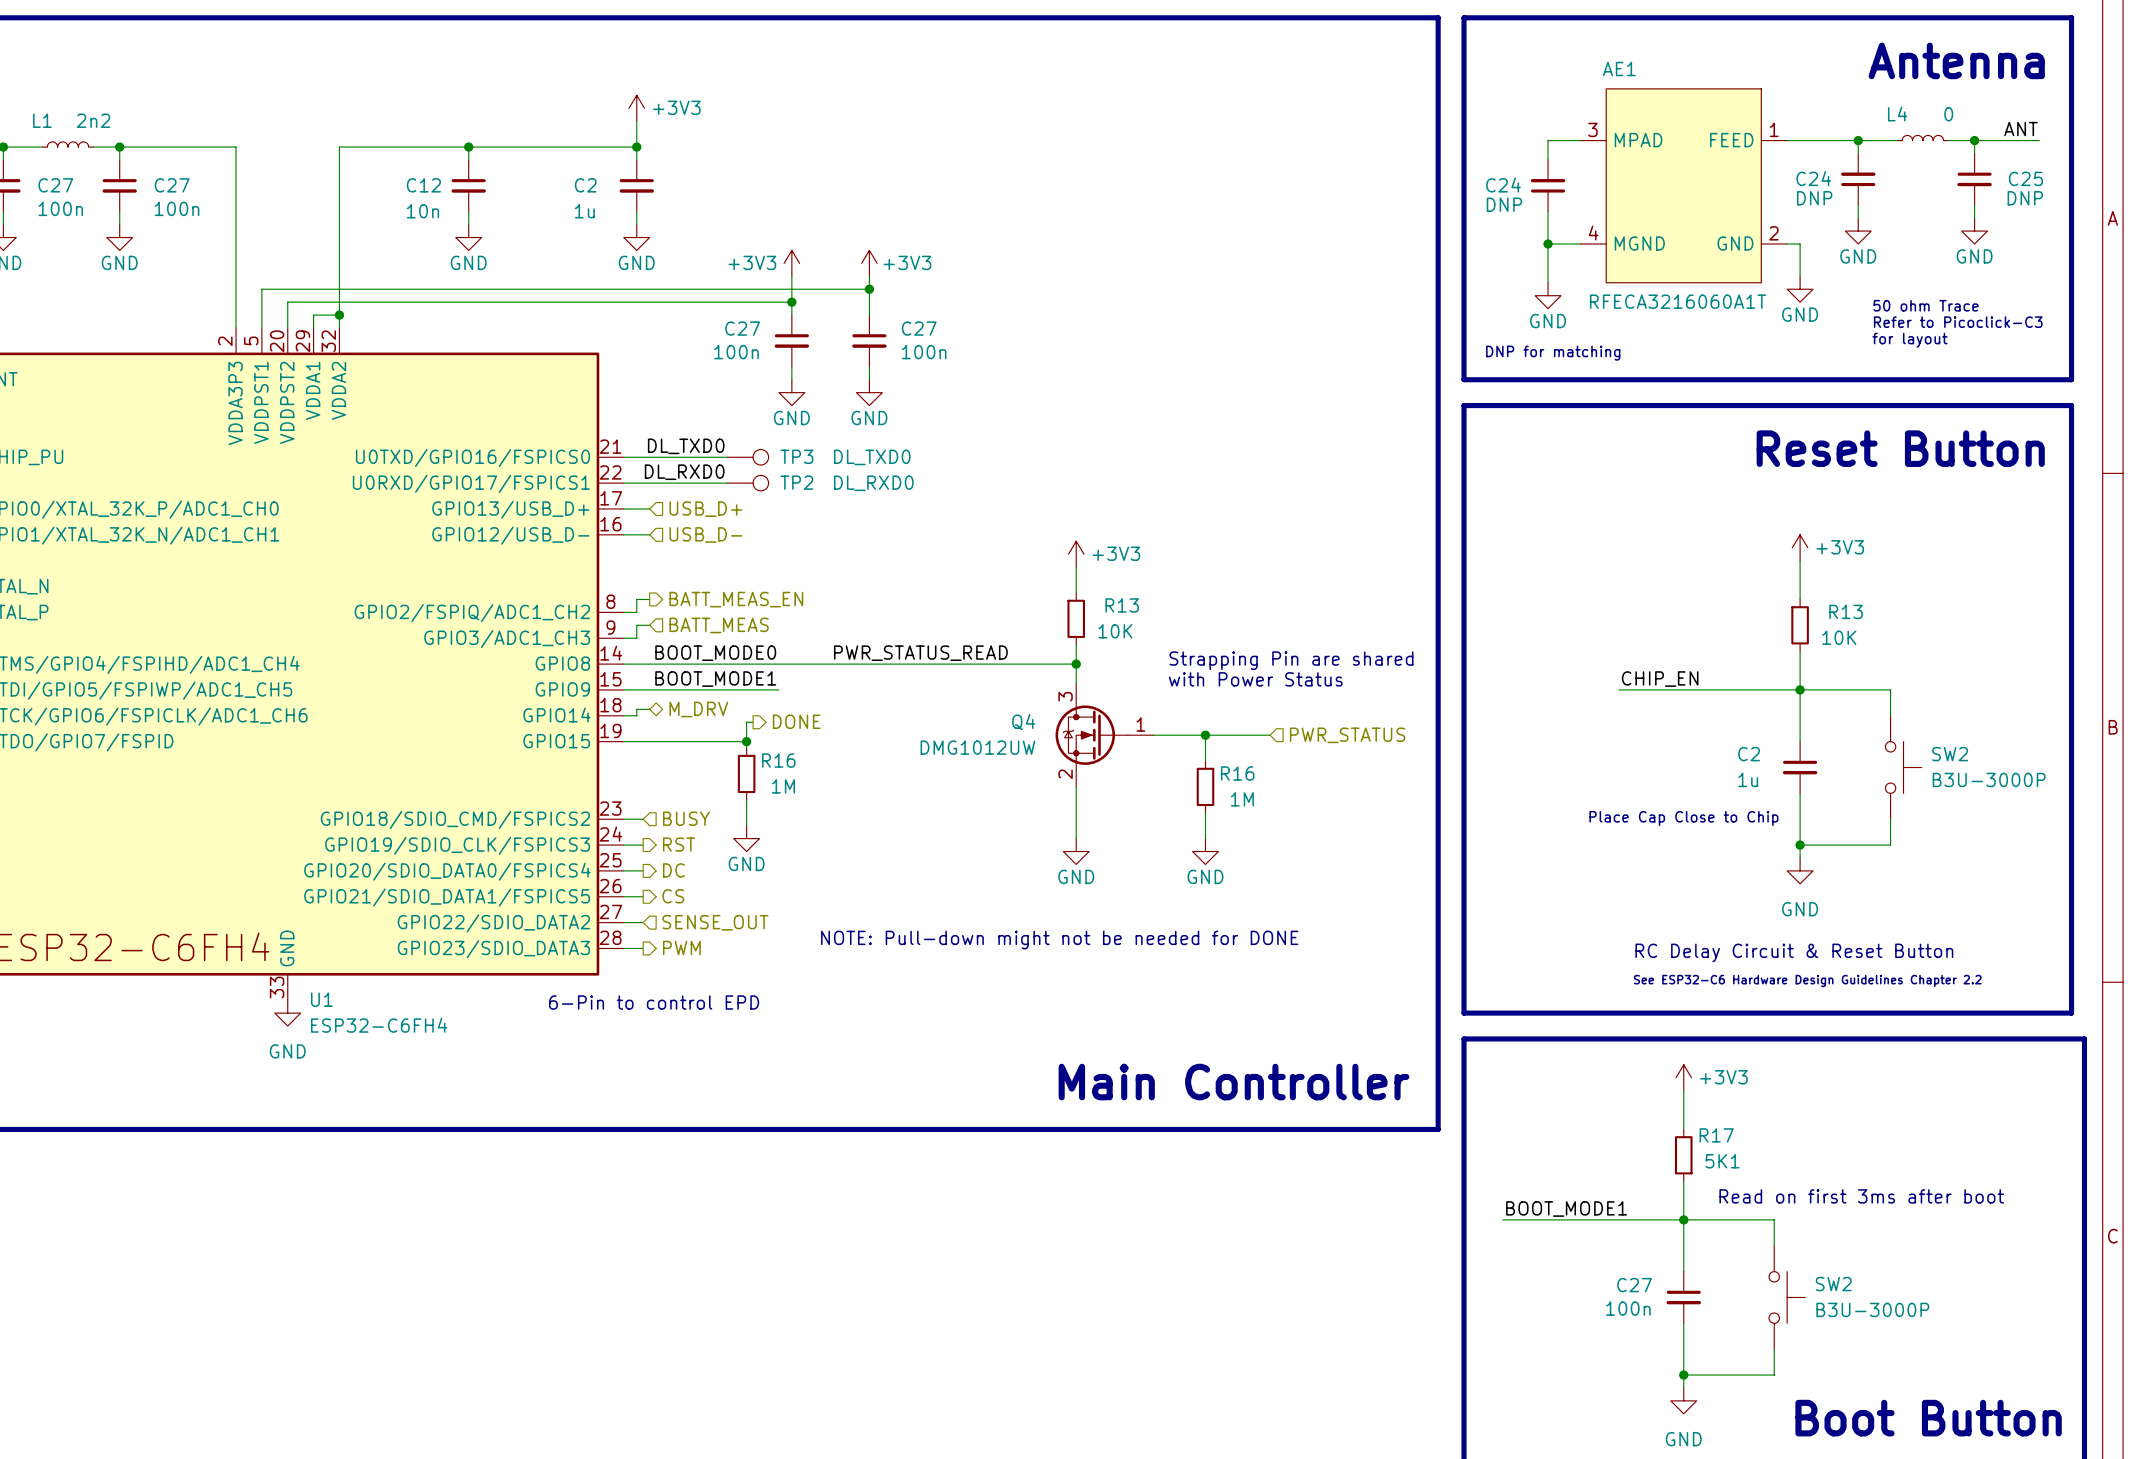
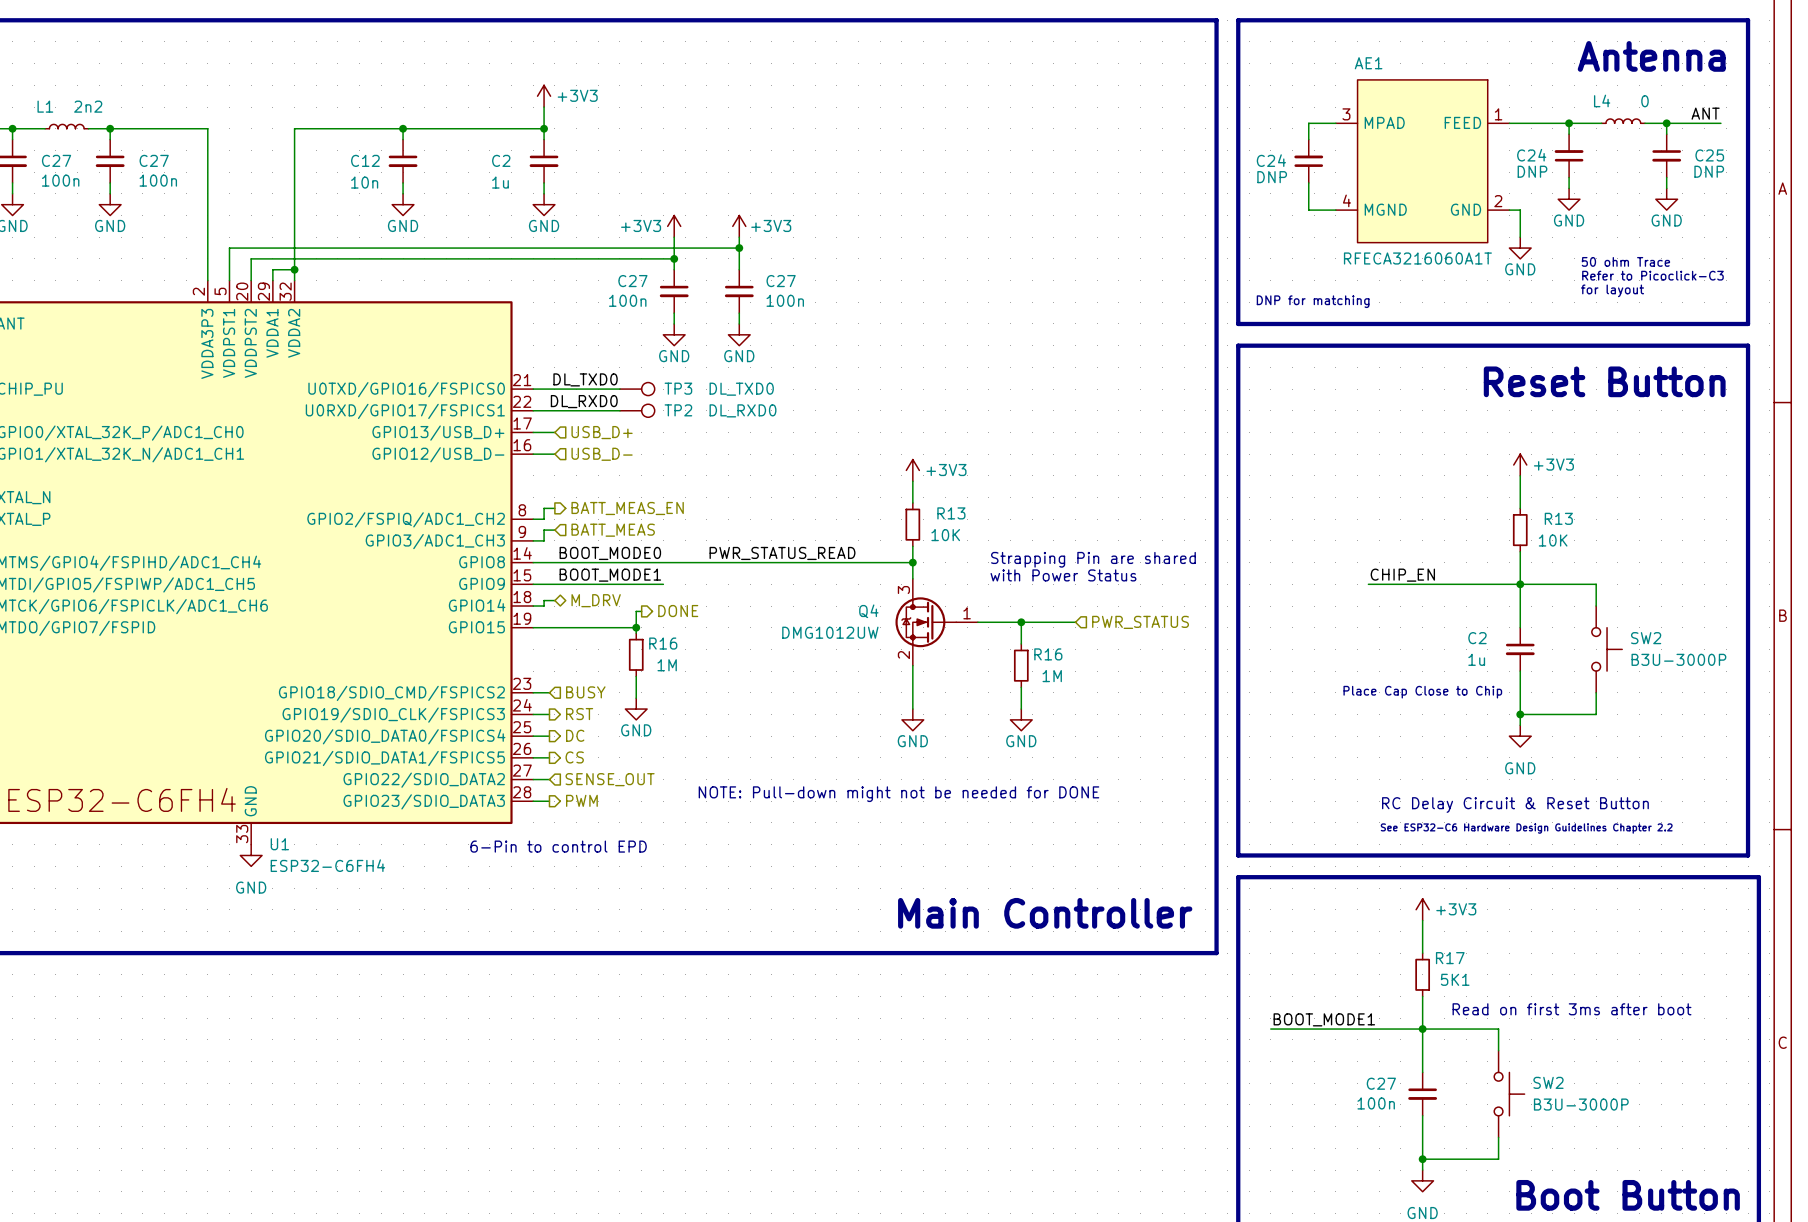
wire: (1548, 244) (1548, 282) -> none
junction: (1548, 244) -> none
power symbol: GND (1548, 295) -> none

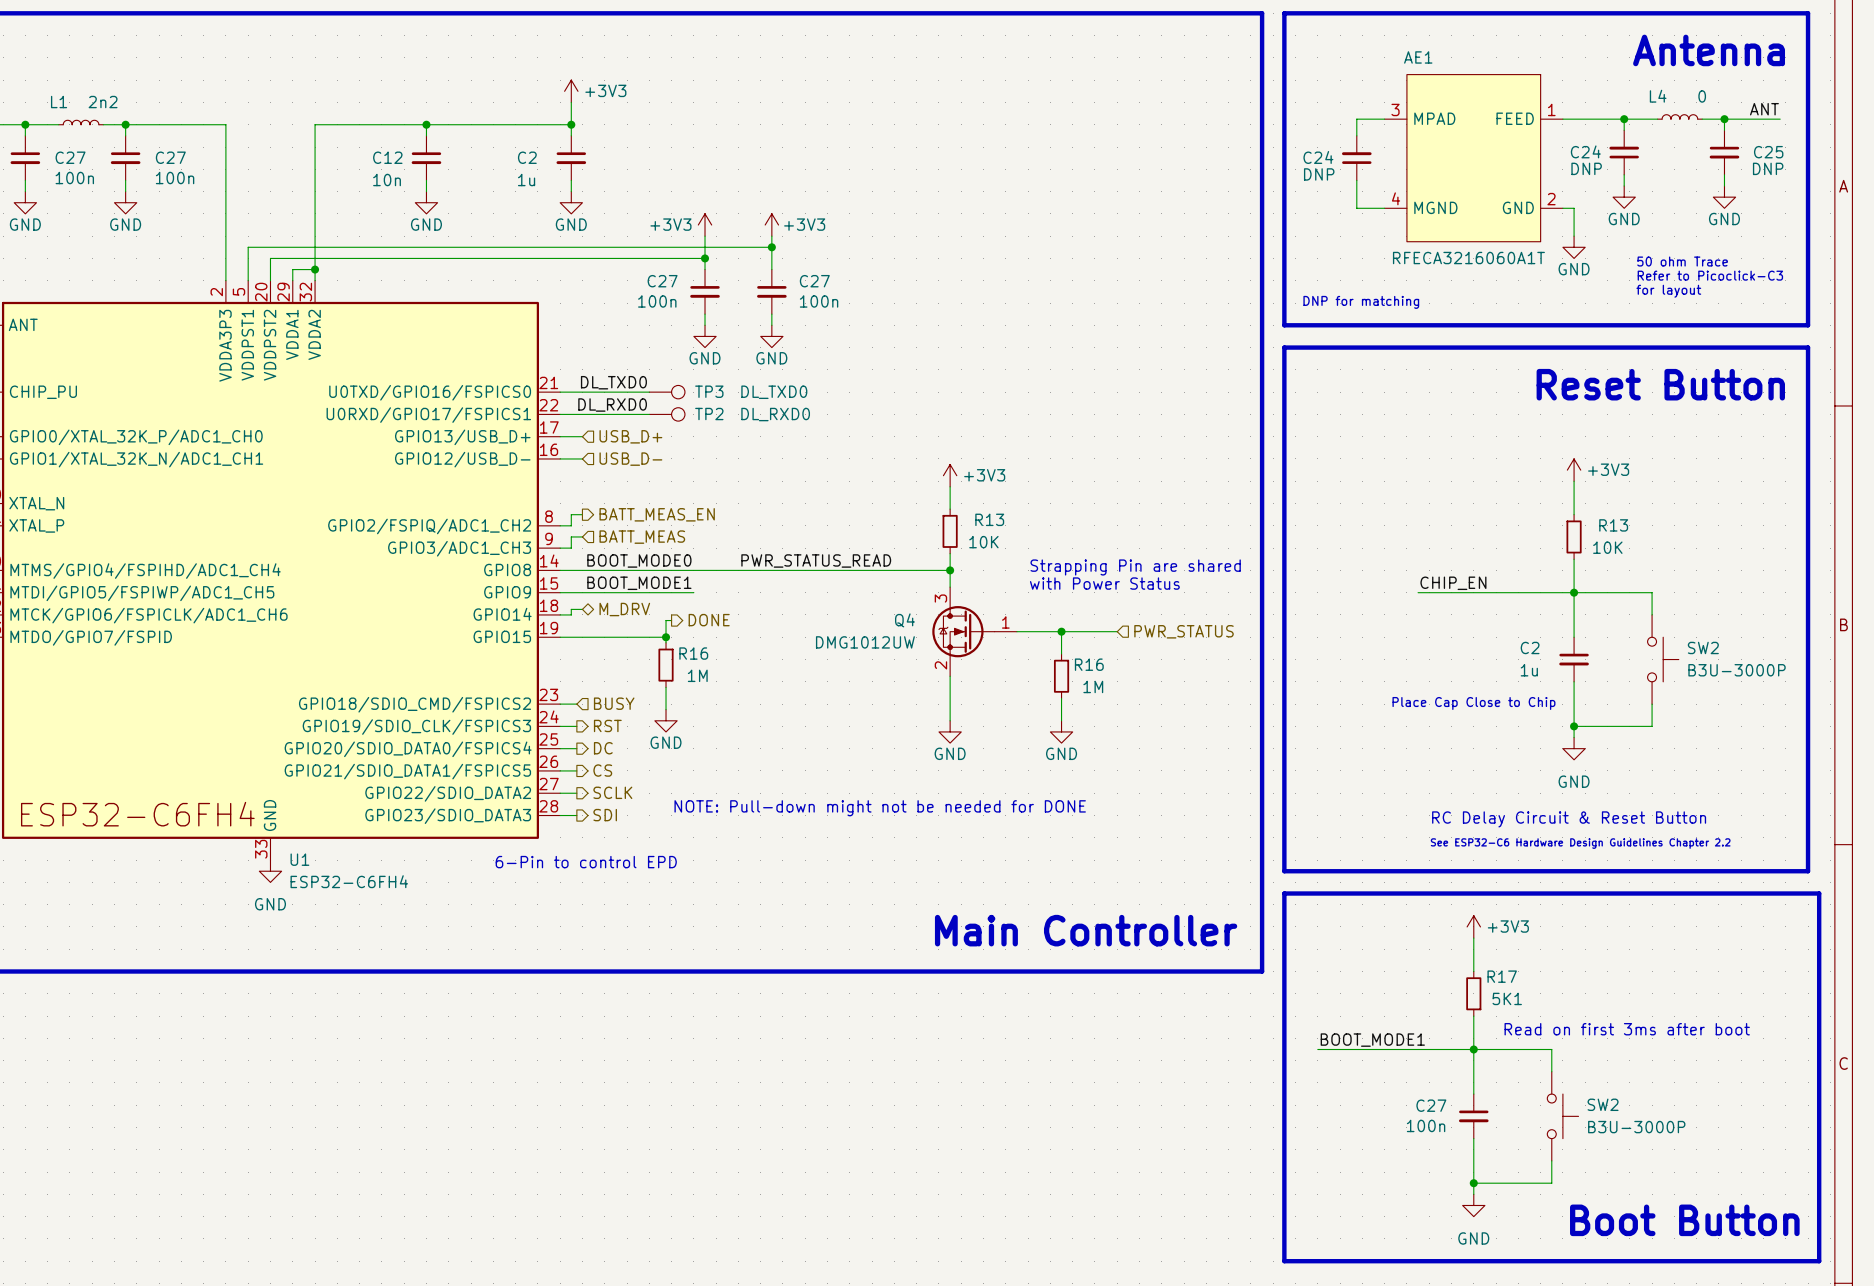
hierarchical label shape: input (610, 779) -> output (612, 792)
hierarchical label: SENSE_OUT (610, 779) -> SCLK (612, 792)
text position: NOTE: Pull-down might not be needed for DONE (898, 794) -> NOTE: Pull-down might not be needed for DONE (880, 808)
hierarchical label: PWM (581, 800) -> SDI (605, 815)

